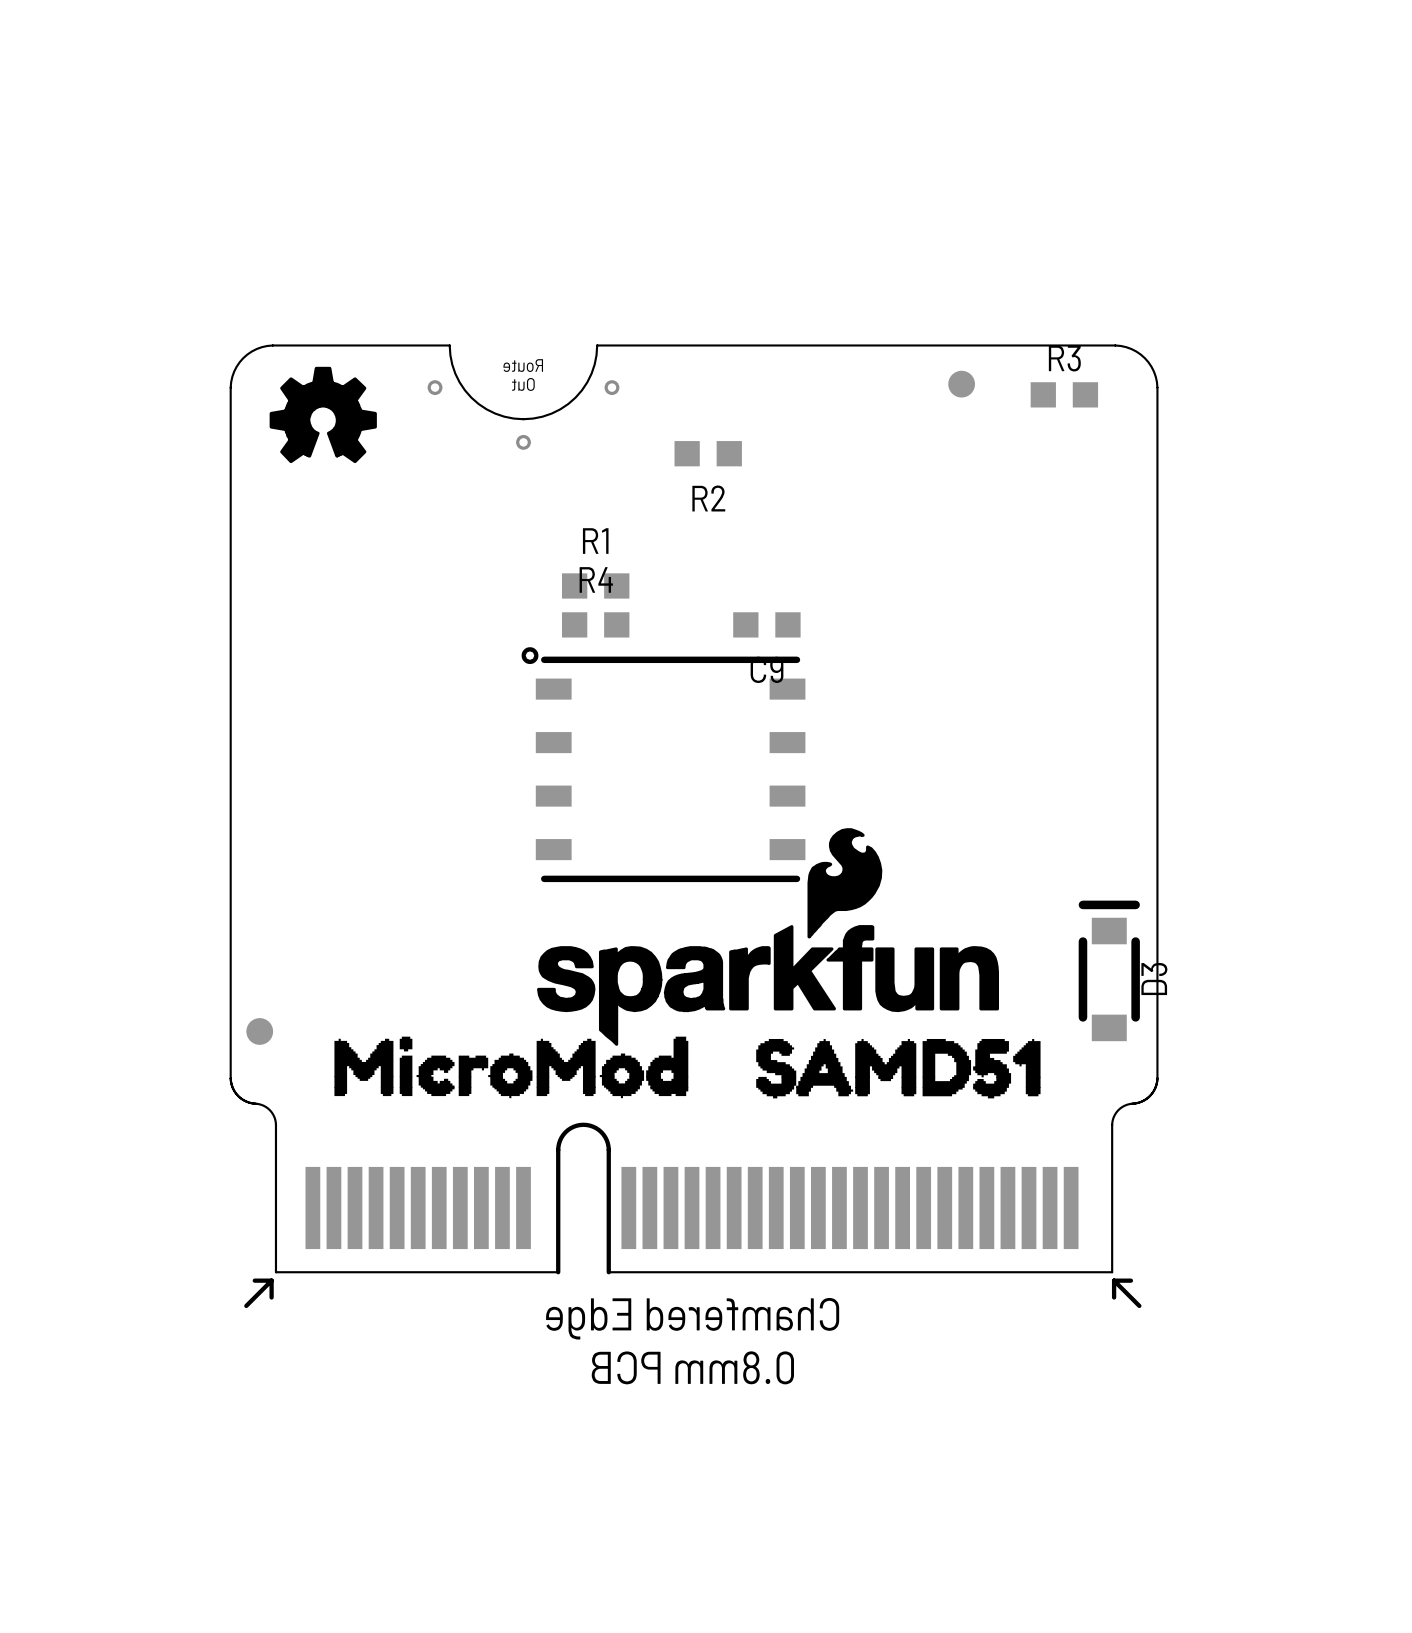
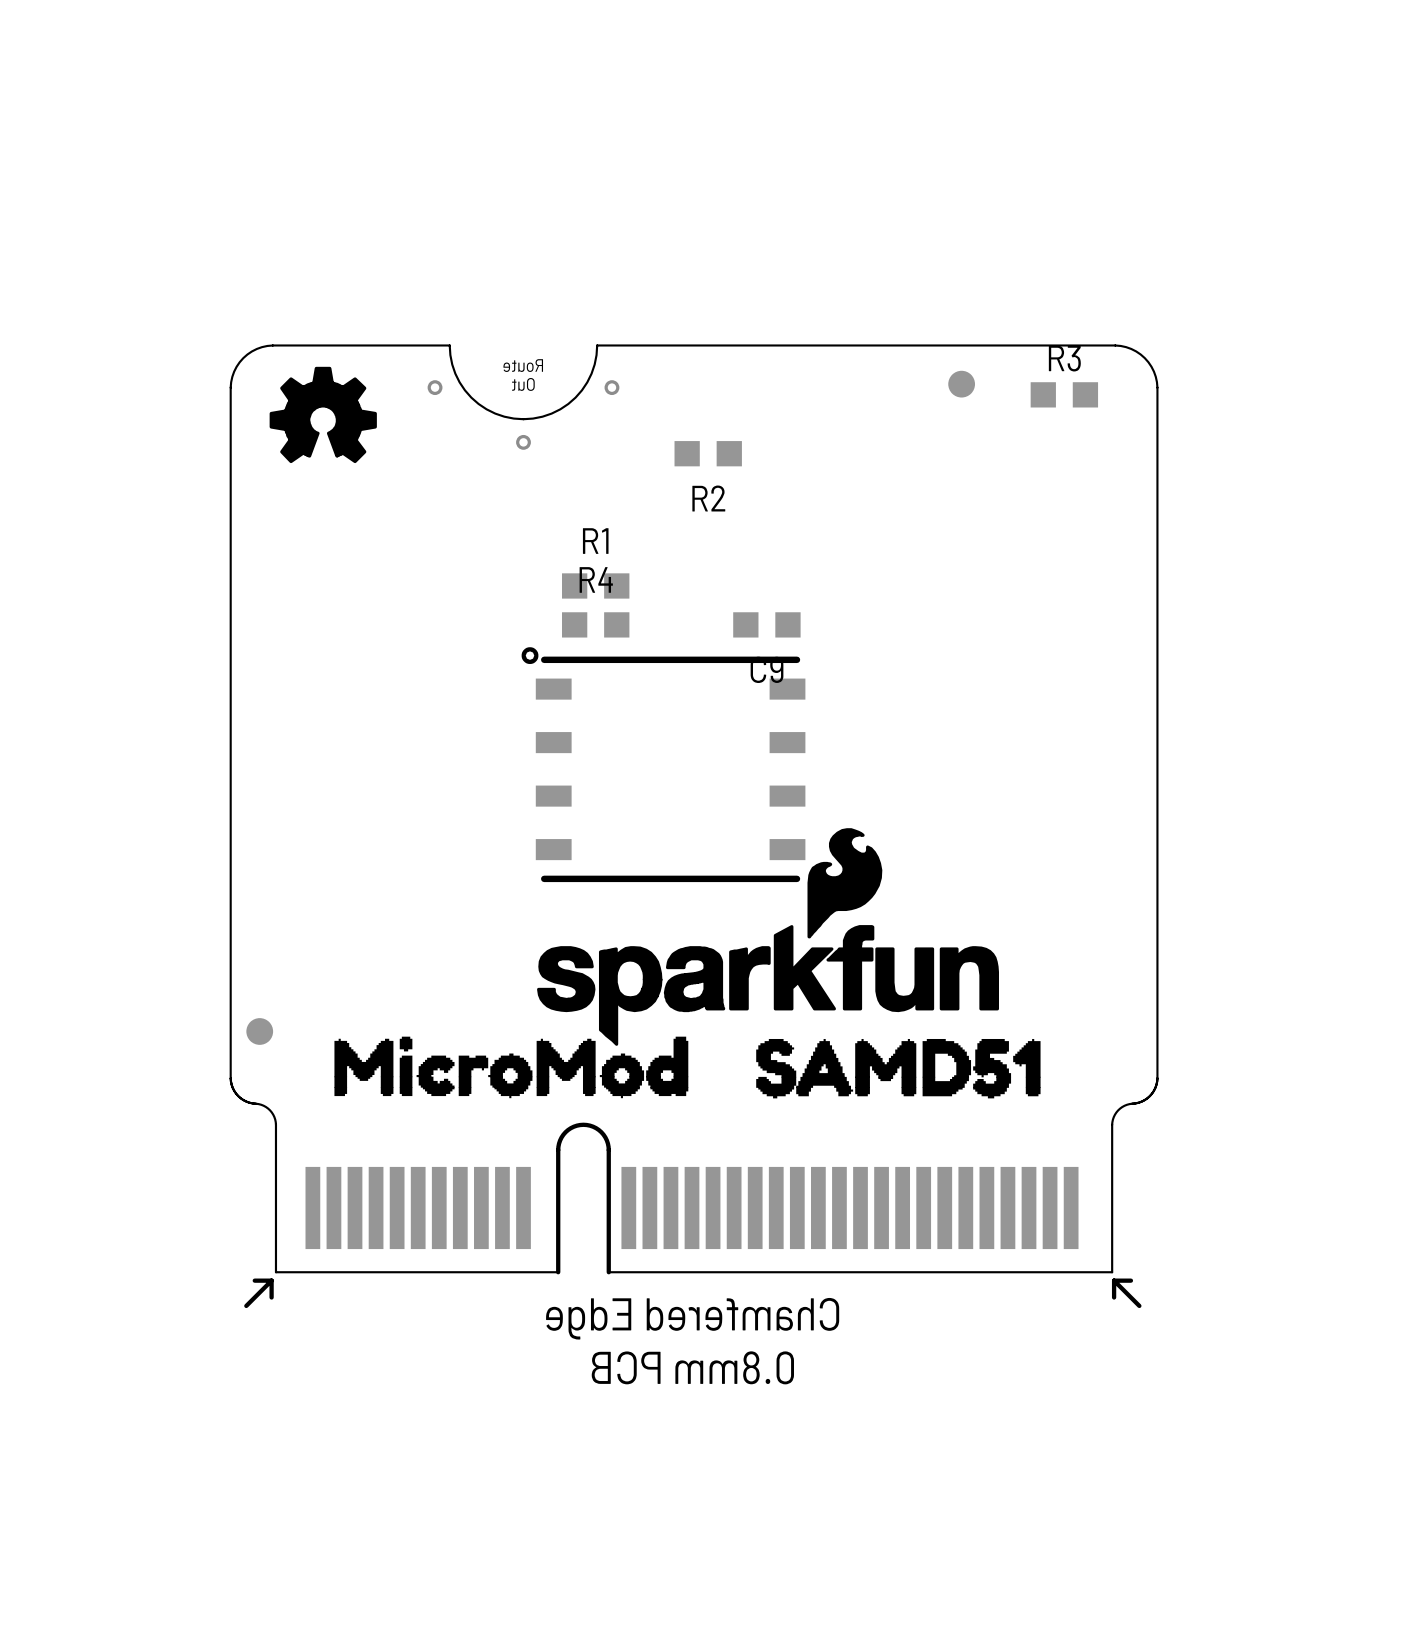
D3: (1109, 970) -> none

